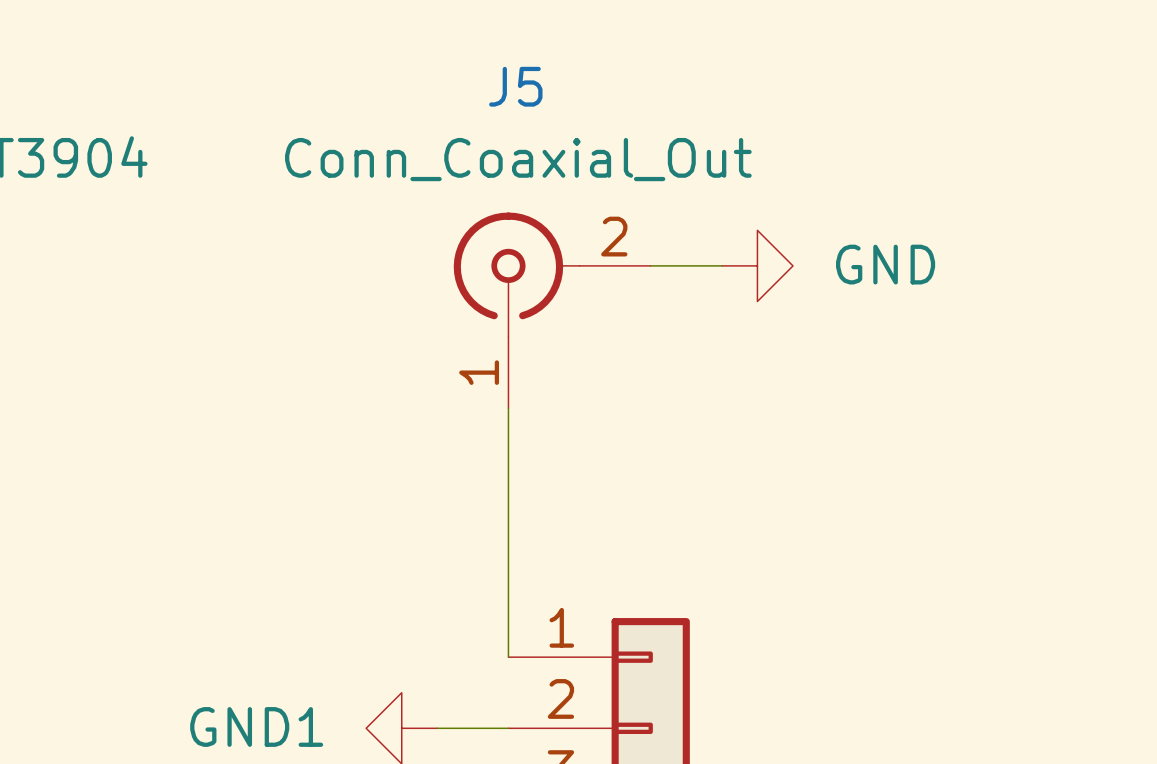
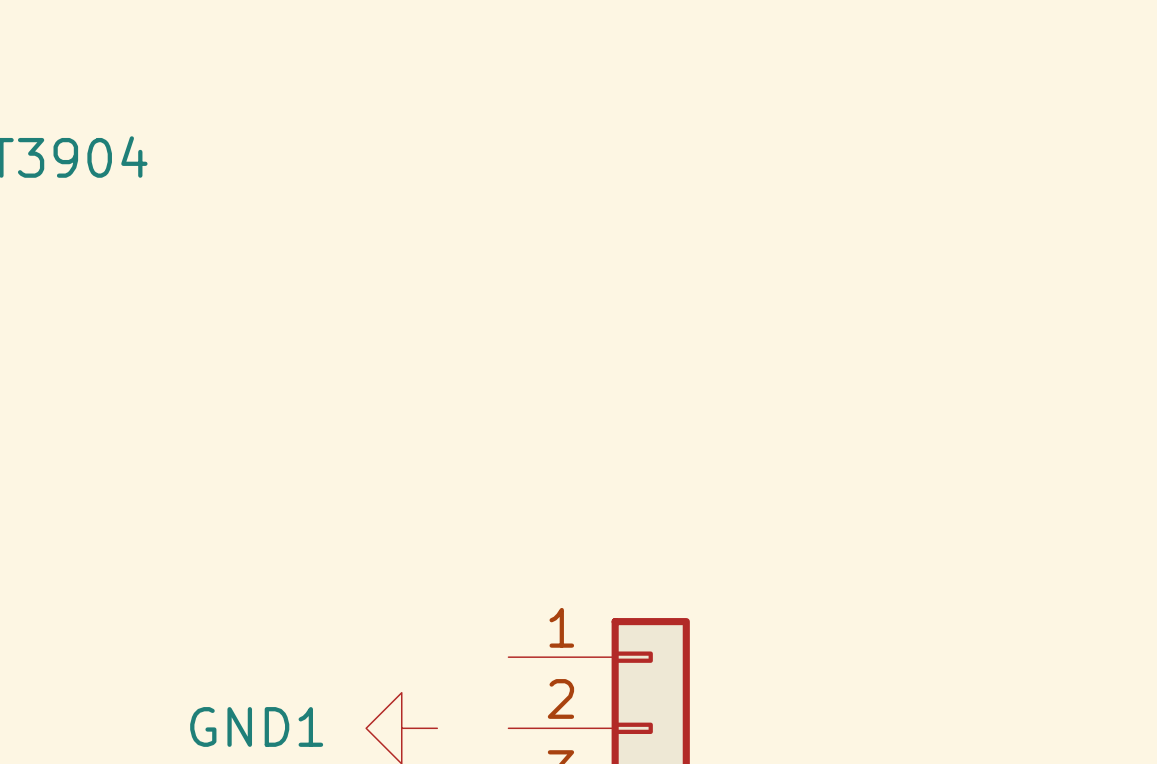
wire: (650, 265) (721, 265) -> none
power symbol: GND (757, 265) -> none
J5: Conn_Coaxial_Out (552, 310) -> none
wire: (508, 408) (508, 657) -> none
wire: (437, 728) (508, 728) -> none

